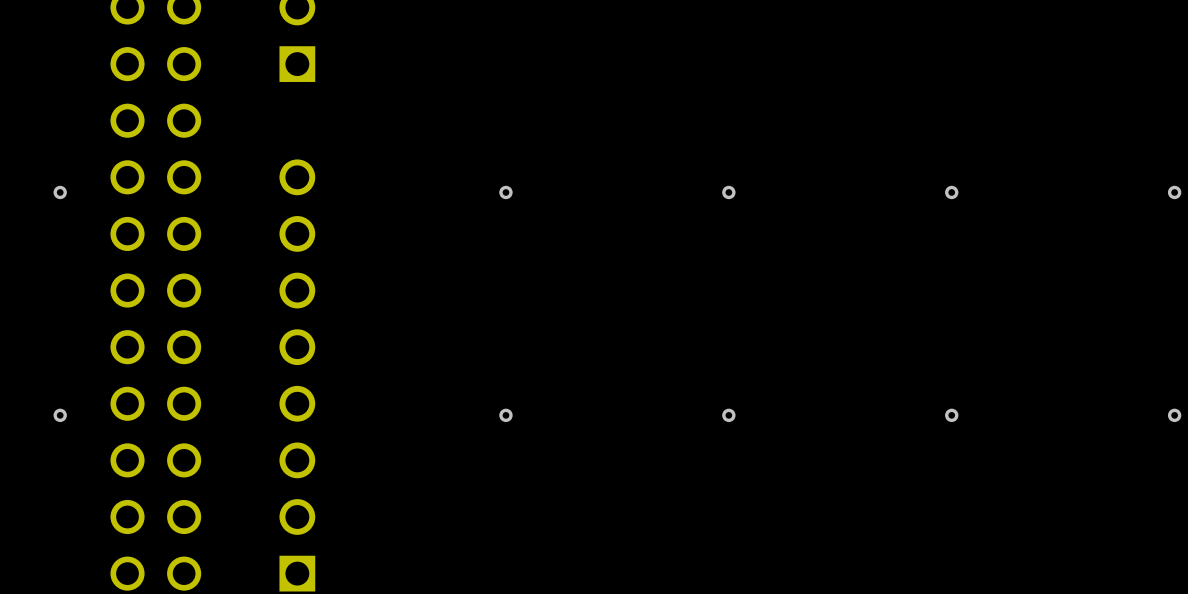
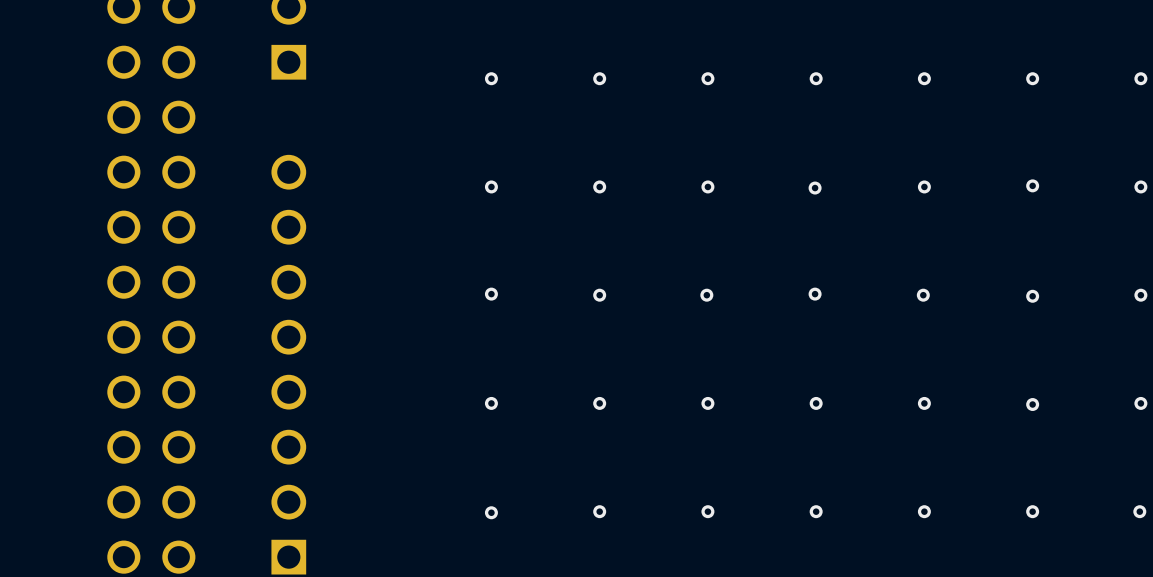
via: none -> (491, 78)
via: none -> (599, 78)
via: none -> (707, 78)
via: none -> (816, 78)
via: none -> (924, 78)
via: none -> (1032, 78)
via: none -> (1140, 78)
via: none -> (1032, 185)
via: (60, 192) -> none
via: none -> (599, 186)
via: none -> (815, 188)
via: none -> (491, 294)
via: none -> (815, 294)
via: none -> (599, 295)
via: none -> (706, 295)
via: none -> (923, 295)
via: none -> (1140, 295)
via: none -> (1032, 296)
via: (60, 415) -> none
via: none -> (599, 403)
via: none -> (816, 403)
via: none -> (1032, 404)
via: none -> (599, 511)
via: none -> (707, 511)
via: none -> (816, 511)
via: none -> (924, 511)
via: none -> (1032, 511)
via: none -> (1139, 511)
via: none -> (491, 512)

